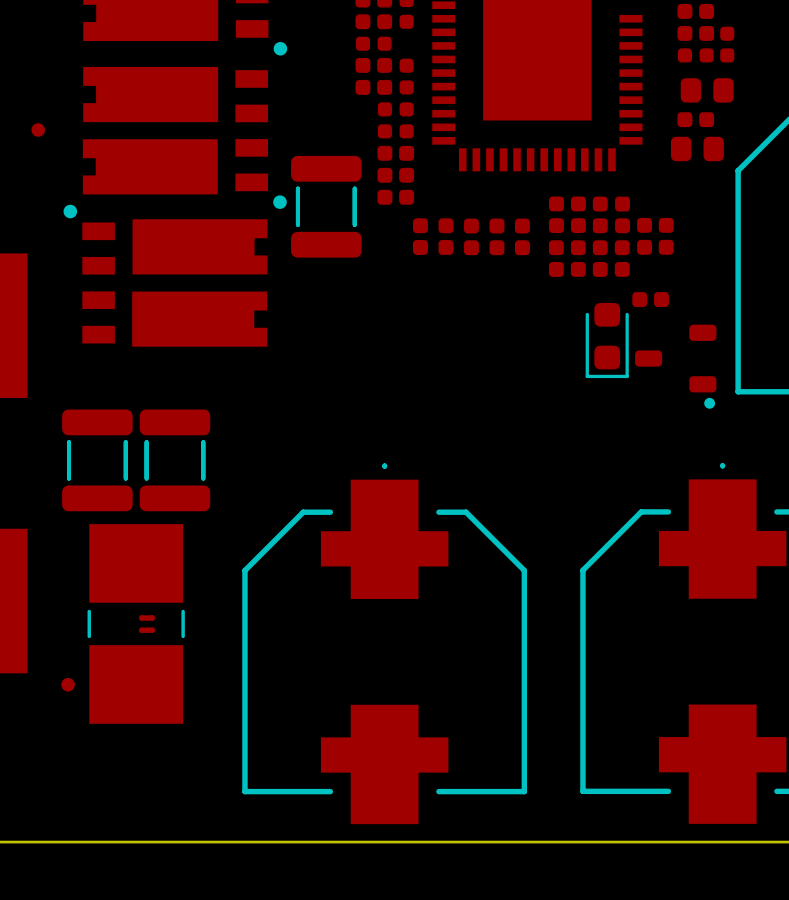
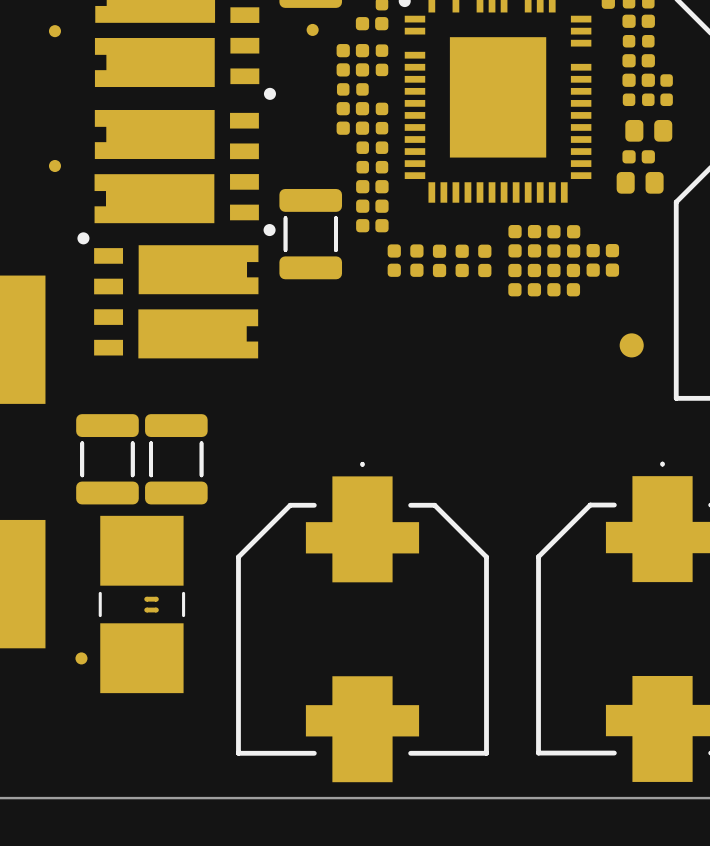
part: (650, 299) -> none
part: none -> (631, 345)
part: (607, 340) -> none
part: (675, 366) -> none

